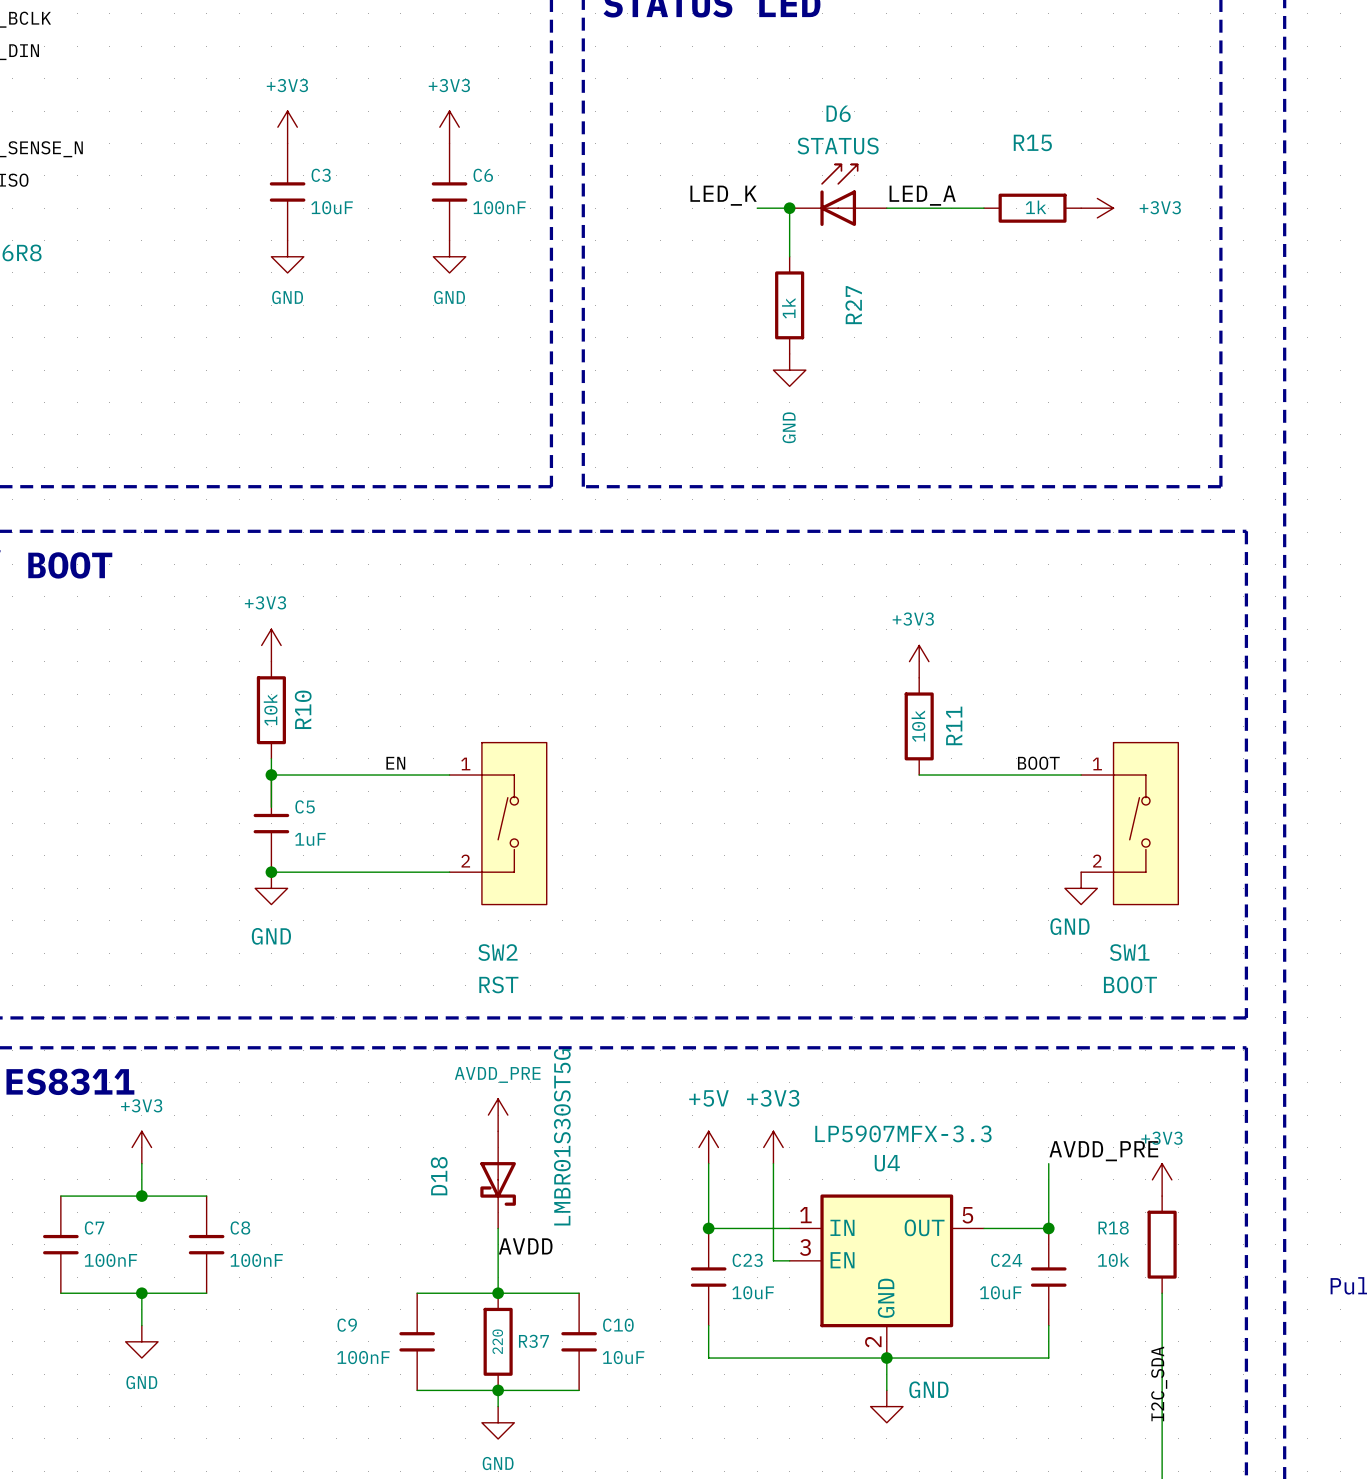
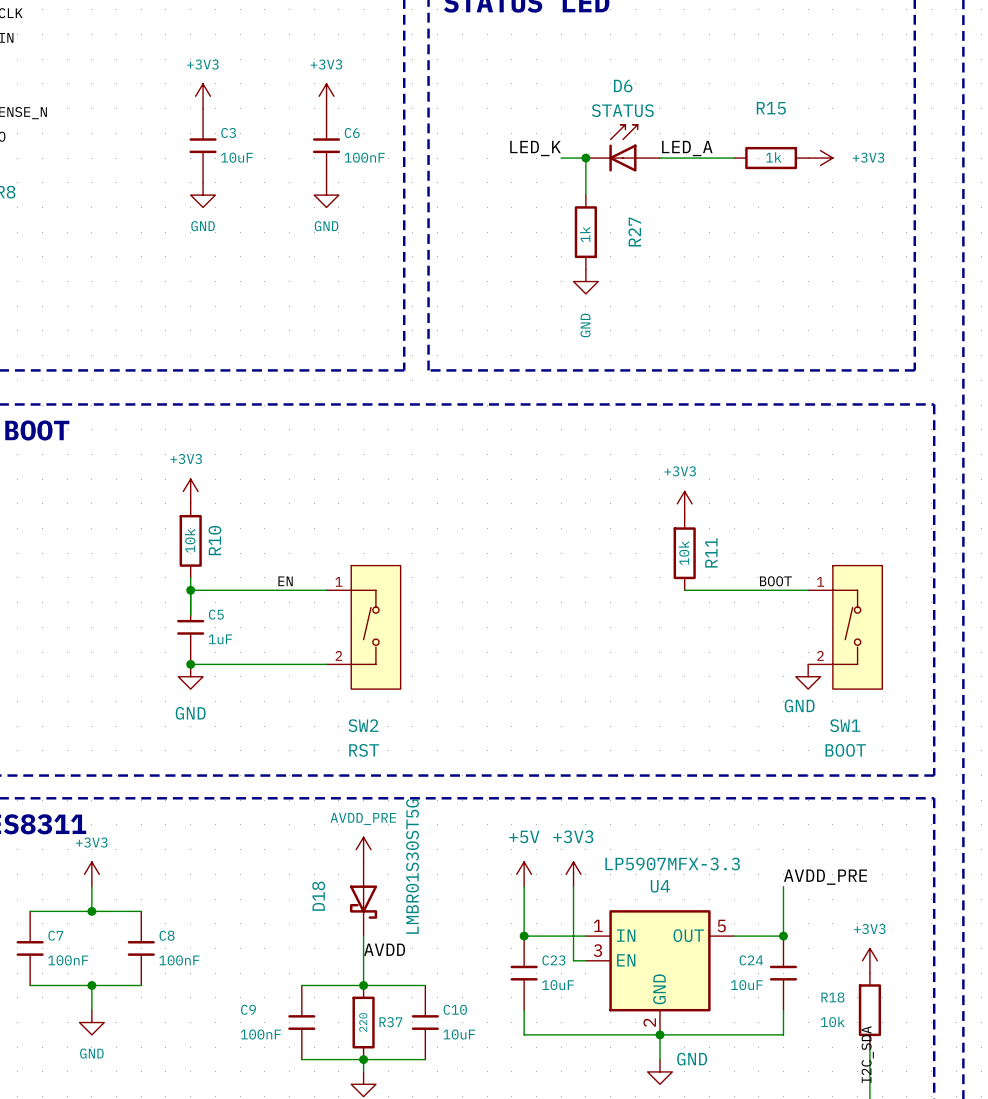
power symbol position: +3V3 (1162, 1179) -> +3V3 (869, 960)
R18 position: (1162, 1244) -> (869, 1010)
wire: (1162, 1293) (1162, 1374) -> none

